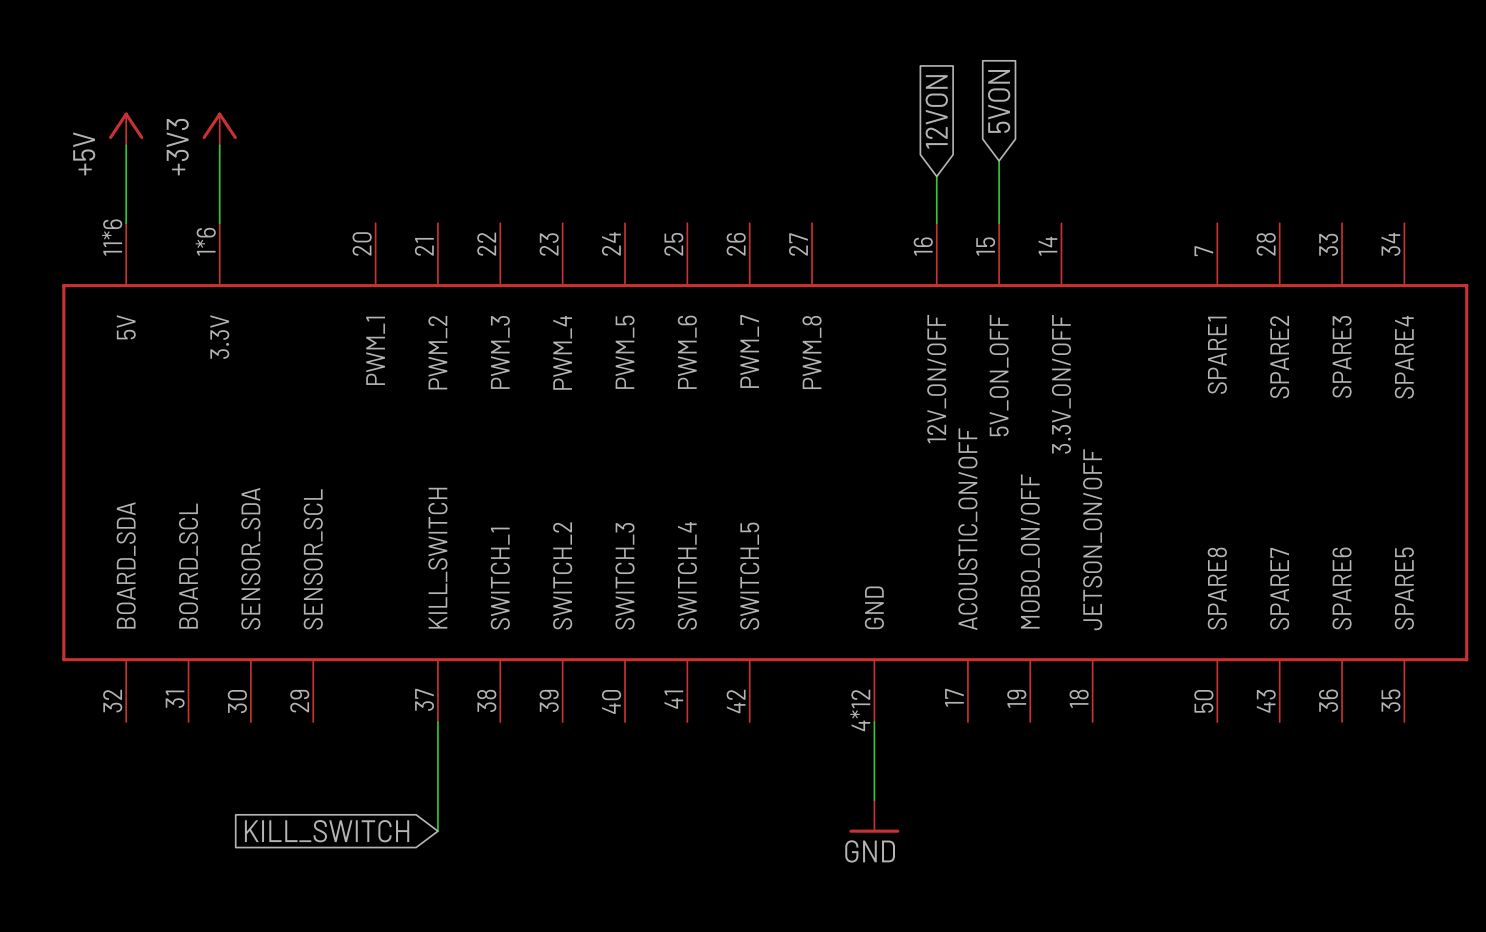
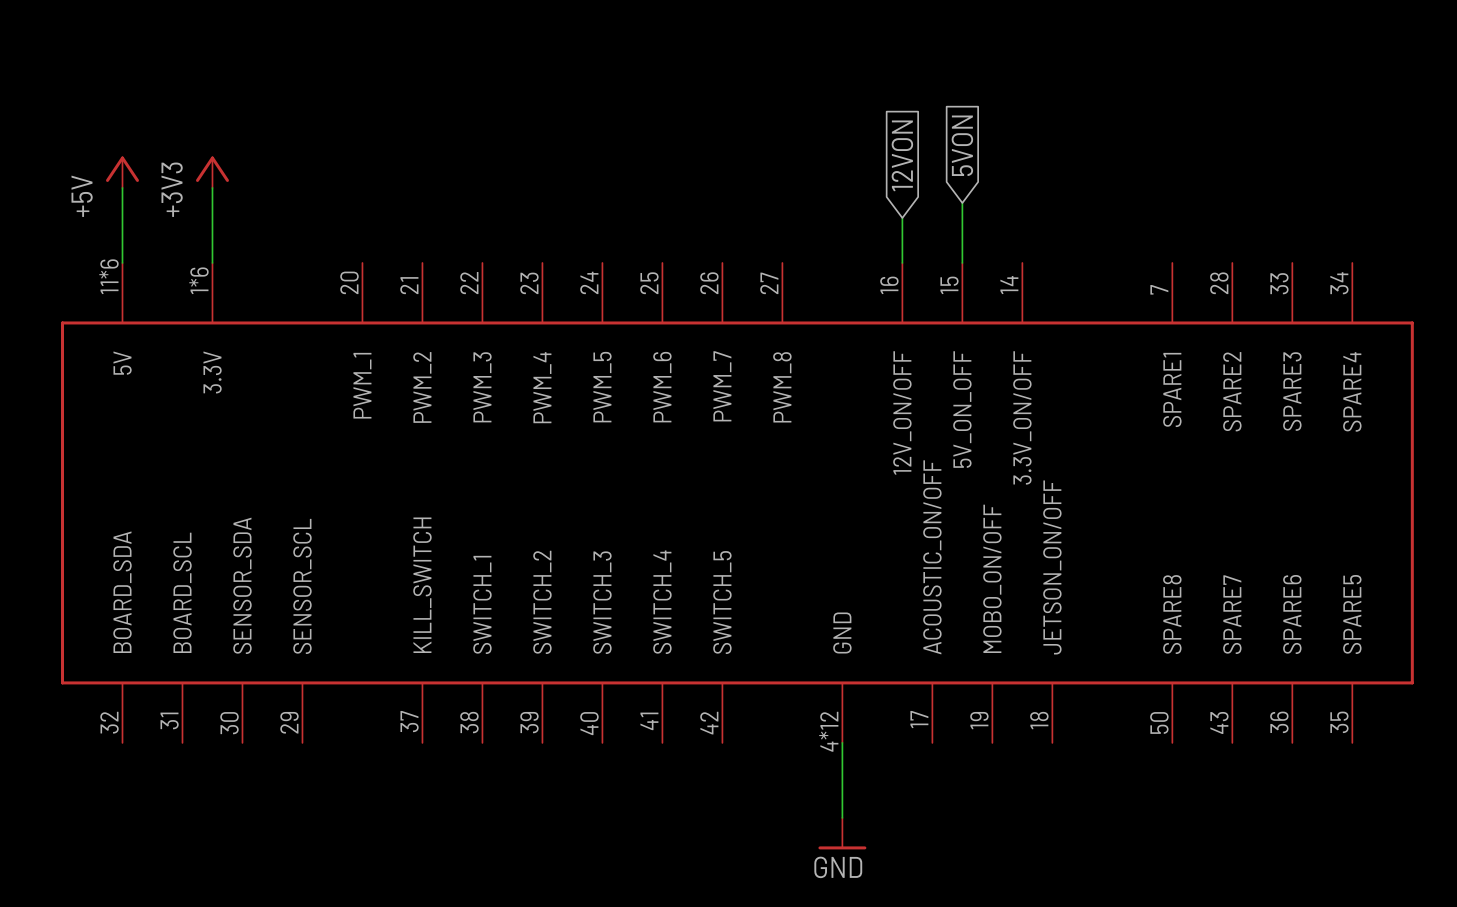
wire: (437, 722) (437, 831) -> none
global label: KILL_SWITCH (327, 831) -> none

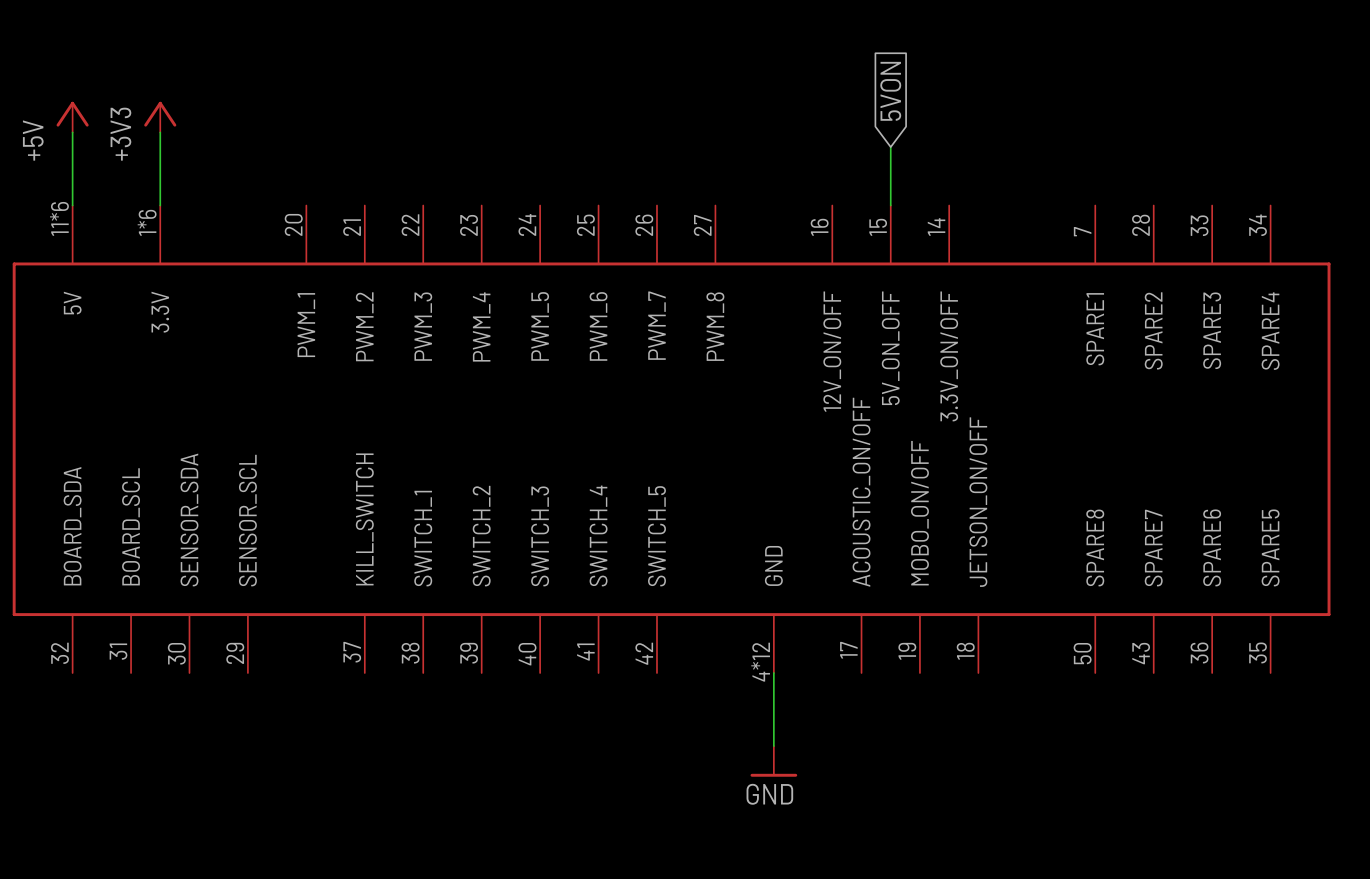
global label: 12VON (902, 155) -> none
wire: (902, 217) (902, 262) -> none

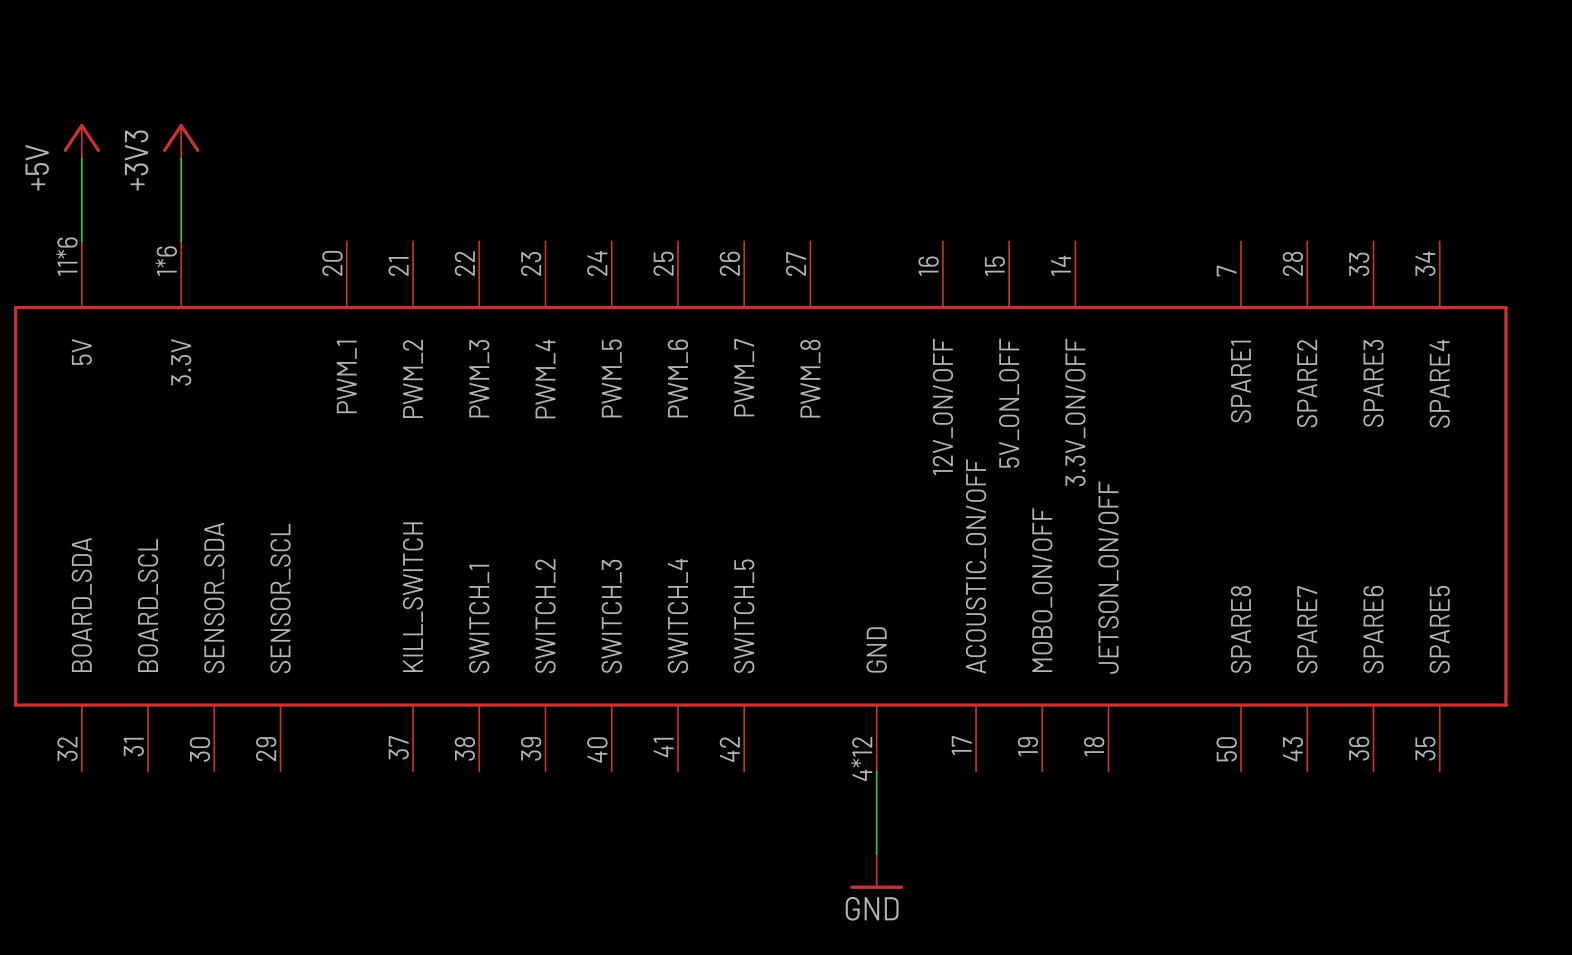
global label: 5VON (890, 91) -> none
wire: (890, 147) (890, 205) -> none

